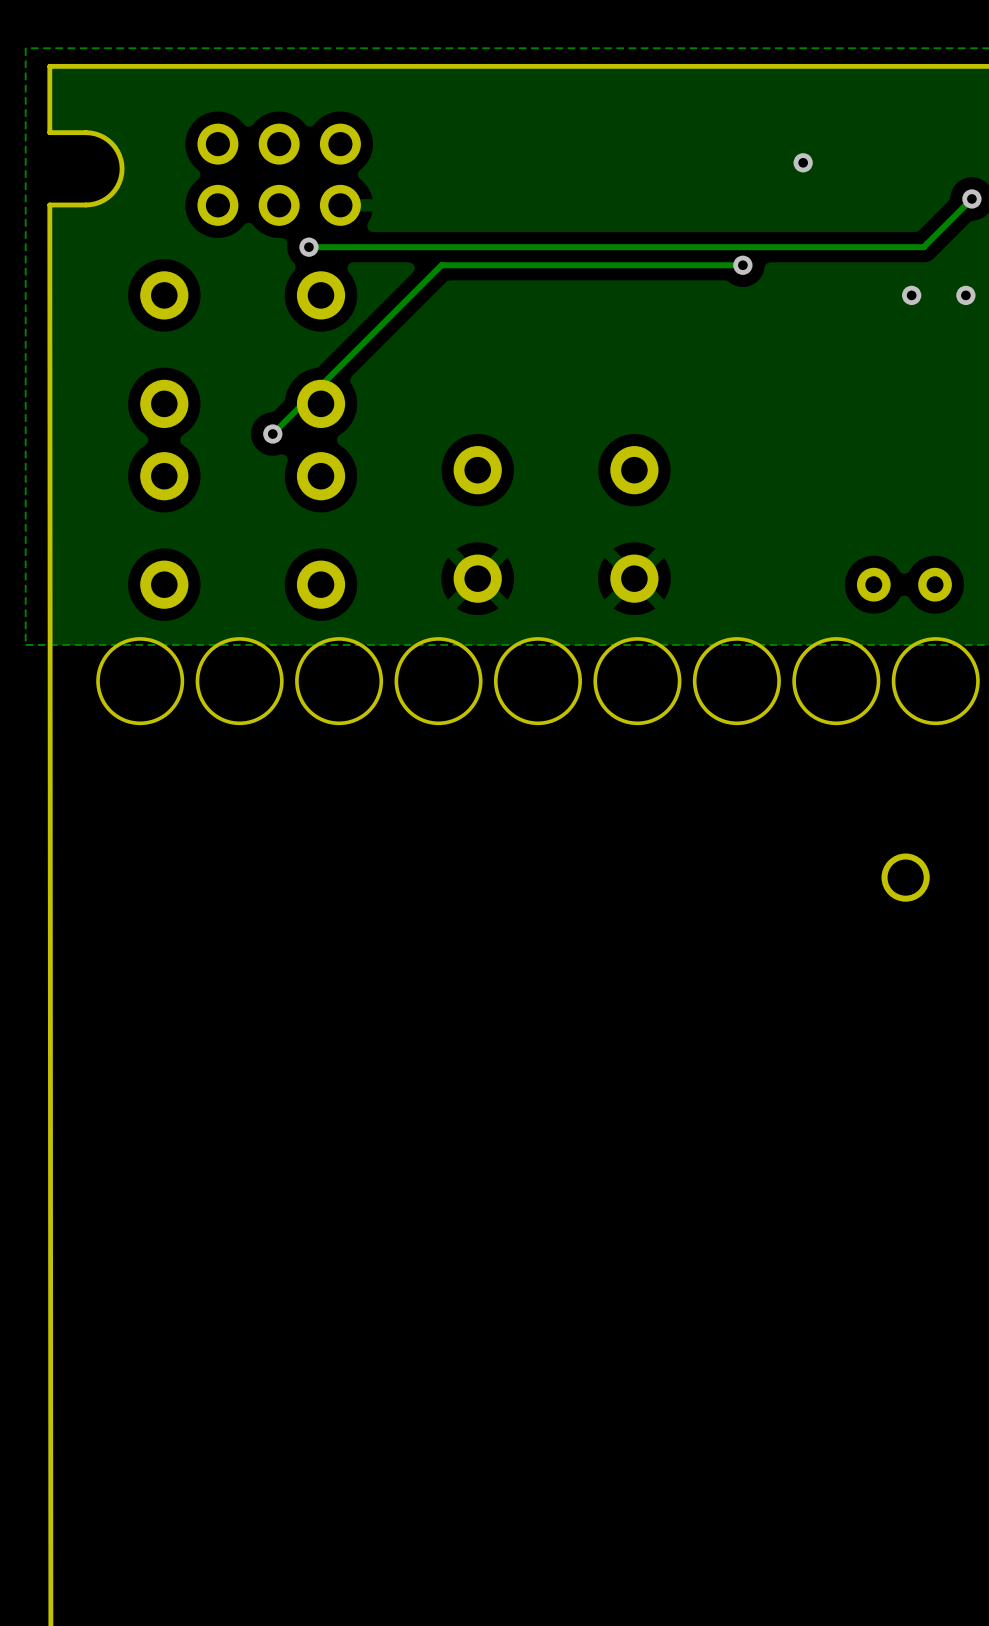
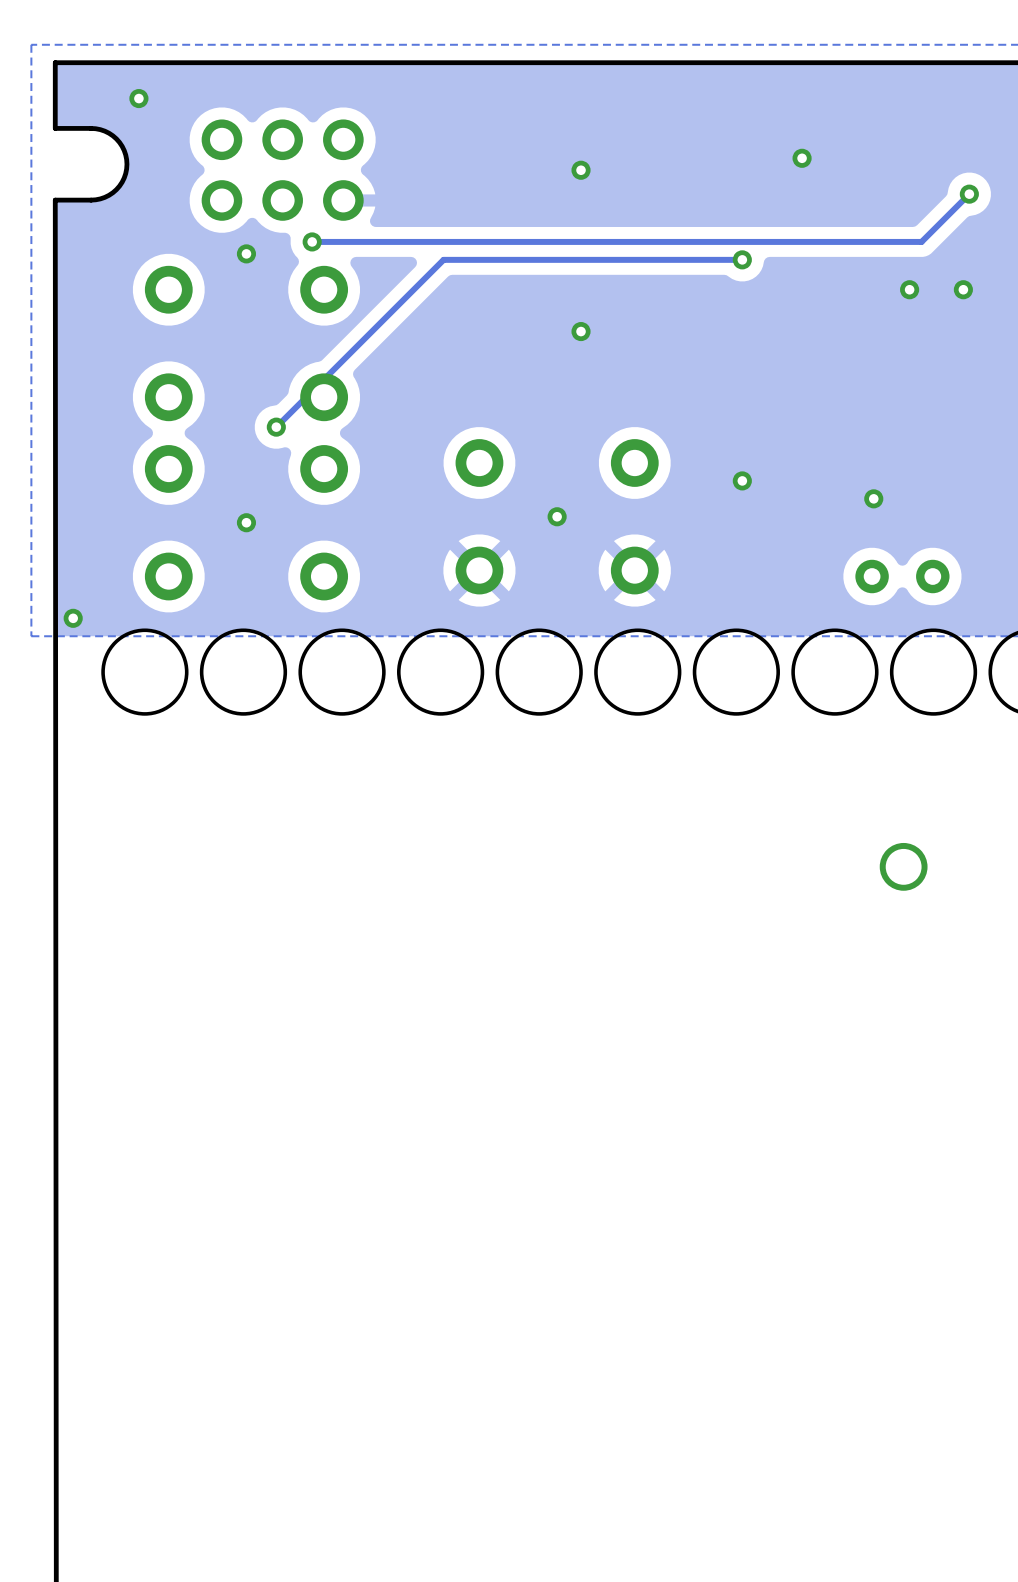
via: none -> (138, 98)
via: none -> (581, 170)
via: none -> (246, 253)
via: none -> (581, 331)
via: none -> (742, 480)
via: none -> (873, 498)
via: none -> (557, 516)
via: none -> (246, 522)
via: none -> (73, 618)

